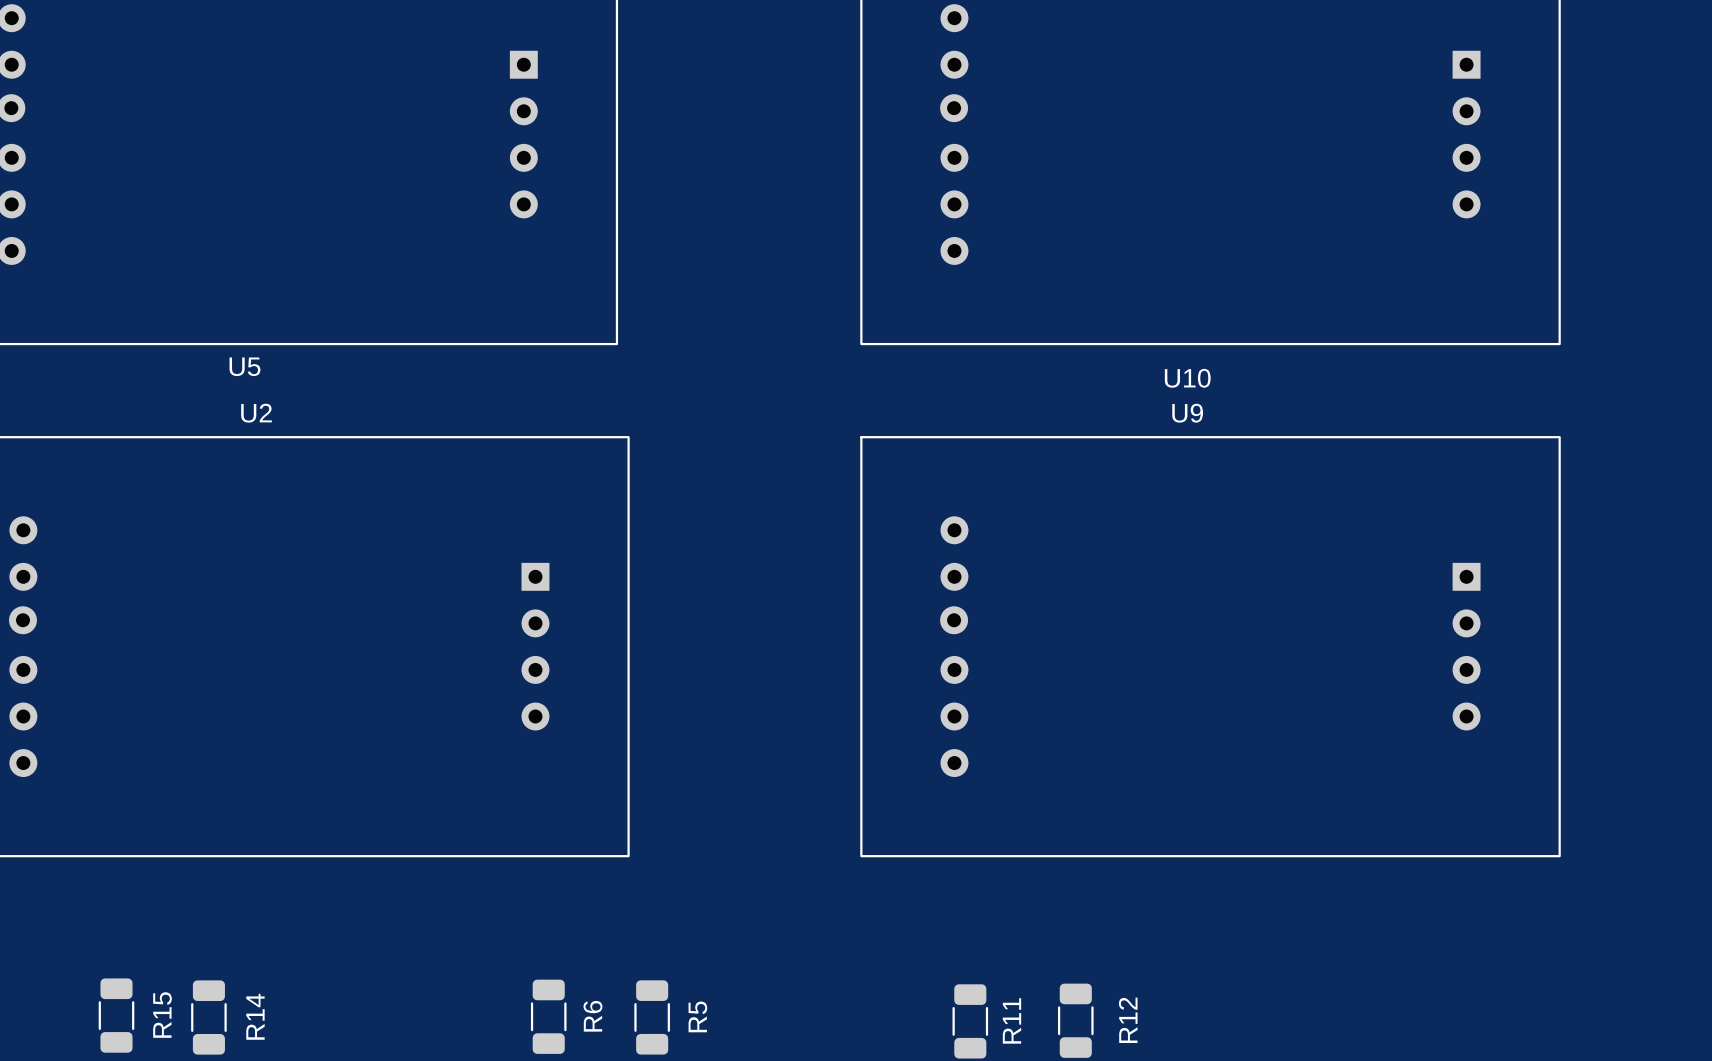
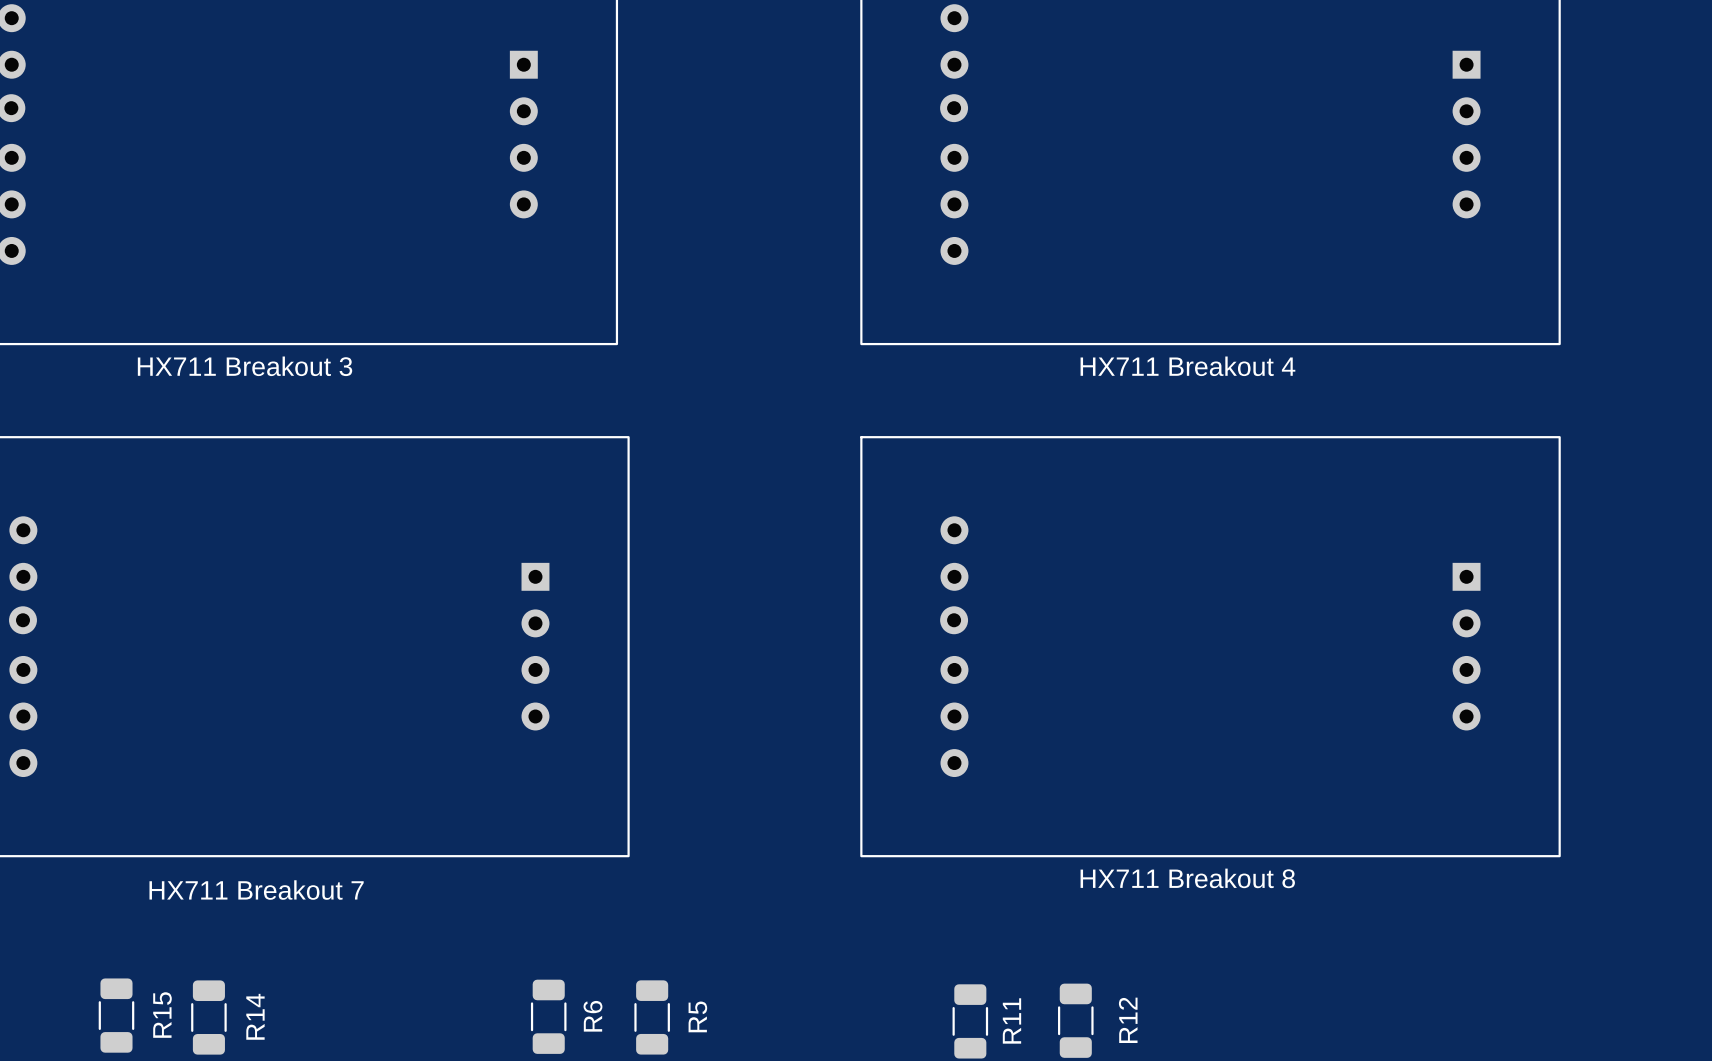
U5 name: U5 (244, 366) -> HX711 Breakout 3 (245, 366)
U10 name: U10 (1187, 378) -> HX711 Breakout 4 (1187, 366)
U2 name: U2 (256, 413) -> HX711 Breakout 7 (256, 890)
U9 name: U9 (1187, 413) -> HX711 Breakout 8 (1187, 878)

